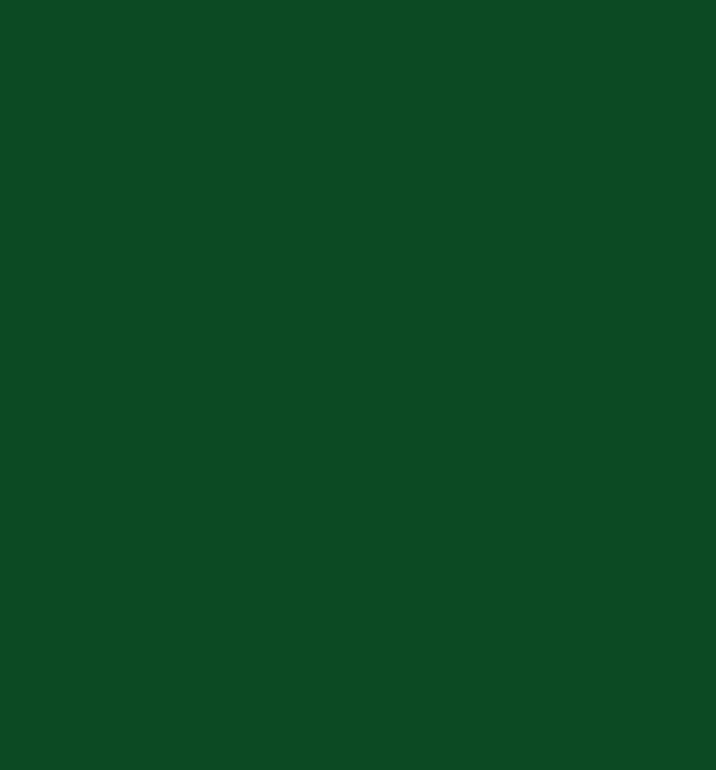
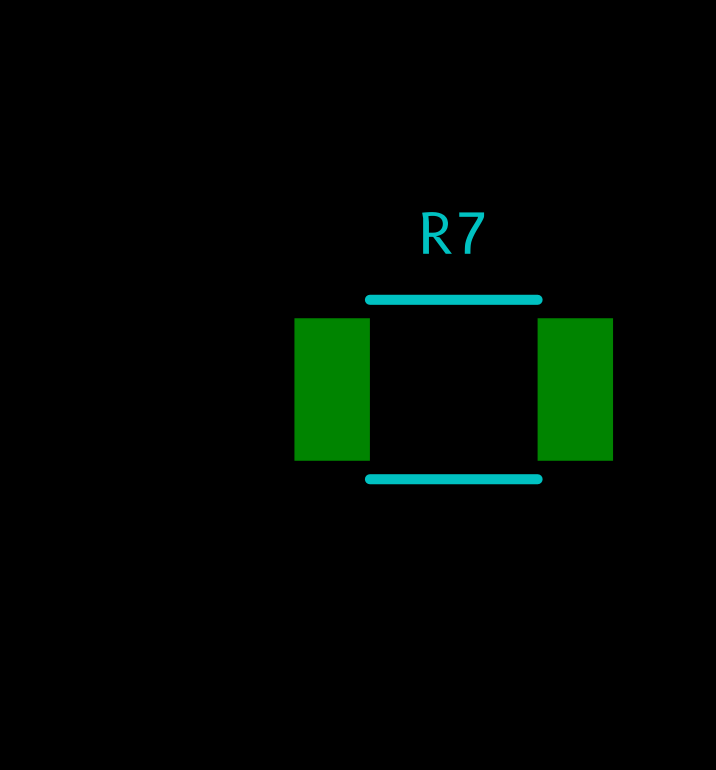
R7: none -> (453, 389)

